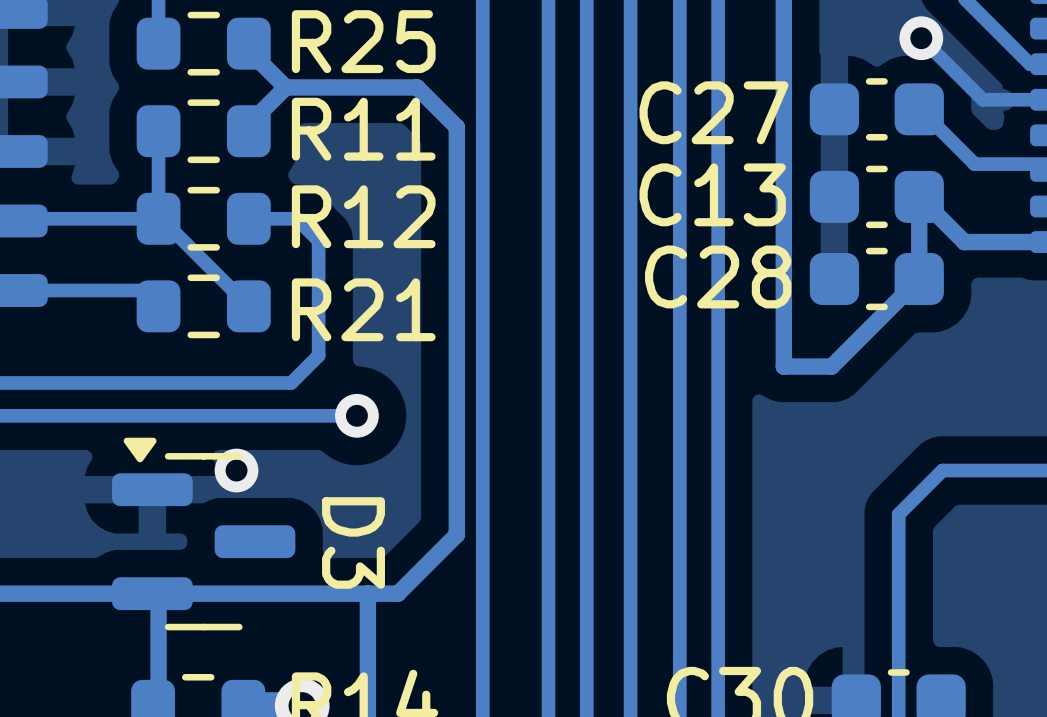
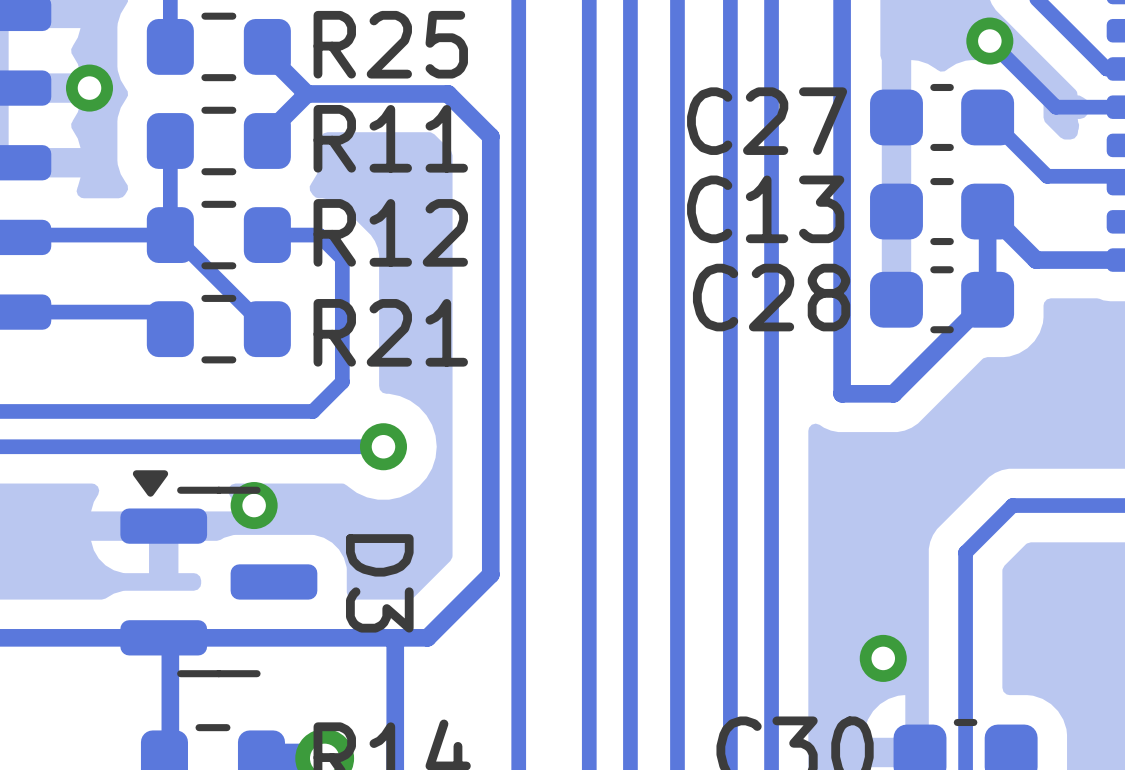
via: none -> (89, 88)
via: none -> (883, 658)

